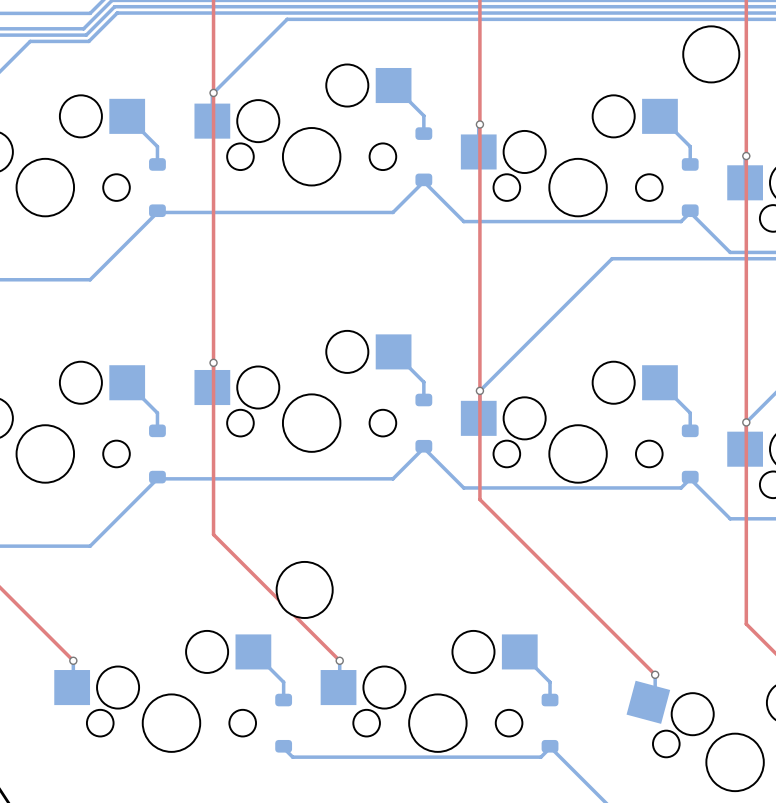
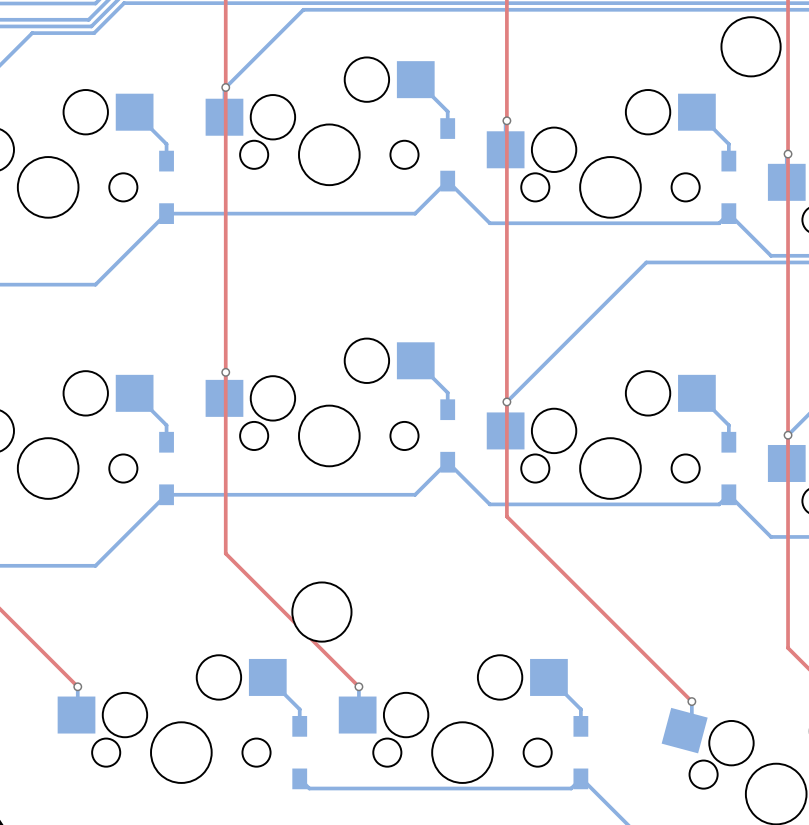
part footprint: [415, 127, 433, 187] -> [440, 118, 456, 192]
part footprint: [149, 158, 166, 218] -> [159, 150, 174, 224]
part footprint: [681, 158, 699, 218] -> [721, 150, 737, 224]
part footprint: [415, 393, 433, 453] -> [440, 399, 456, 473]
part footprint: [149, 424, 166, 484] -> [159, 431, 174, 506]
part footprint: [681, 424, 699, 484] -> [721, 431, 737, 506]
part footprint: [275, 693, 293, 753] -> [292, 716, 308, 790]
part footprint: [541, 693, 559, 753] -> [573, 716, 589, 790]

